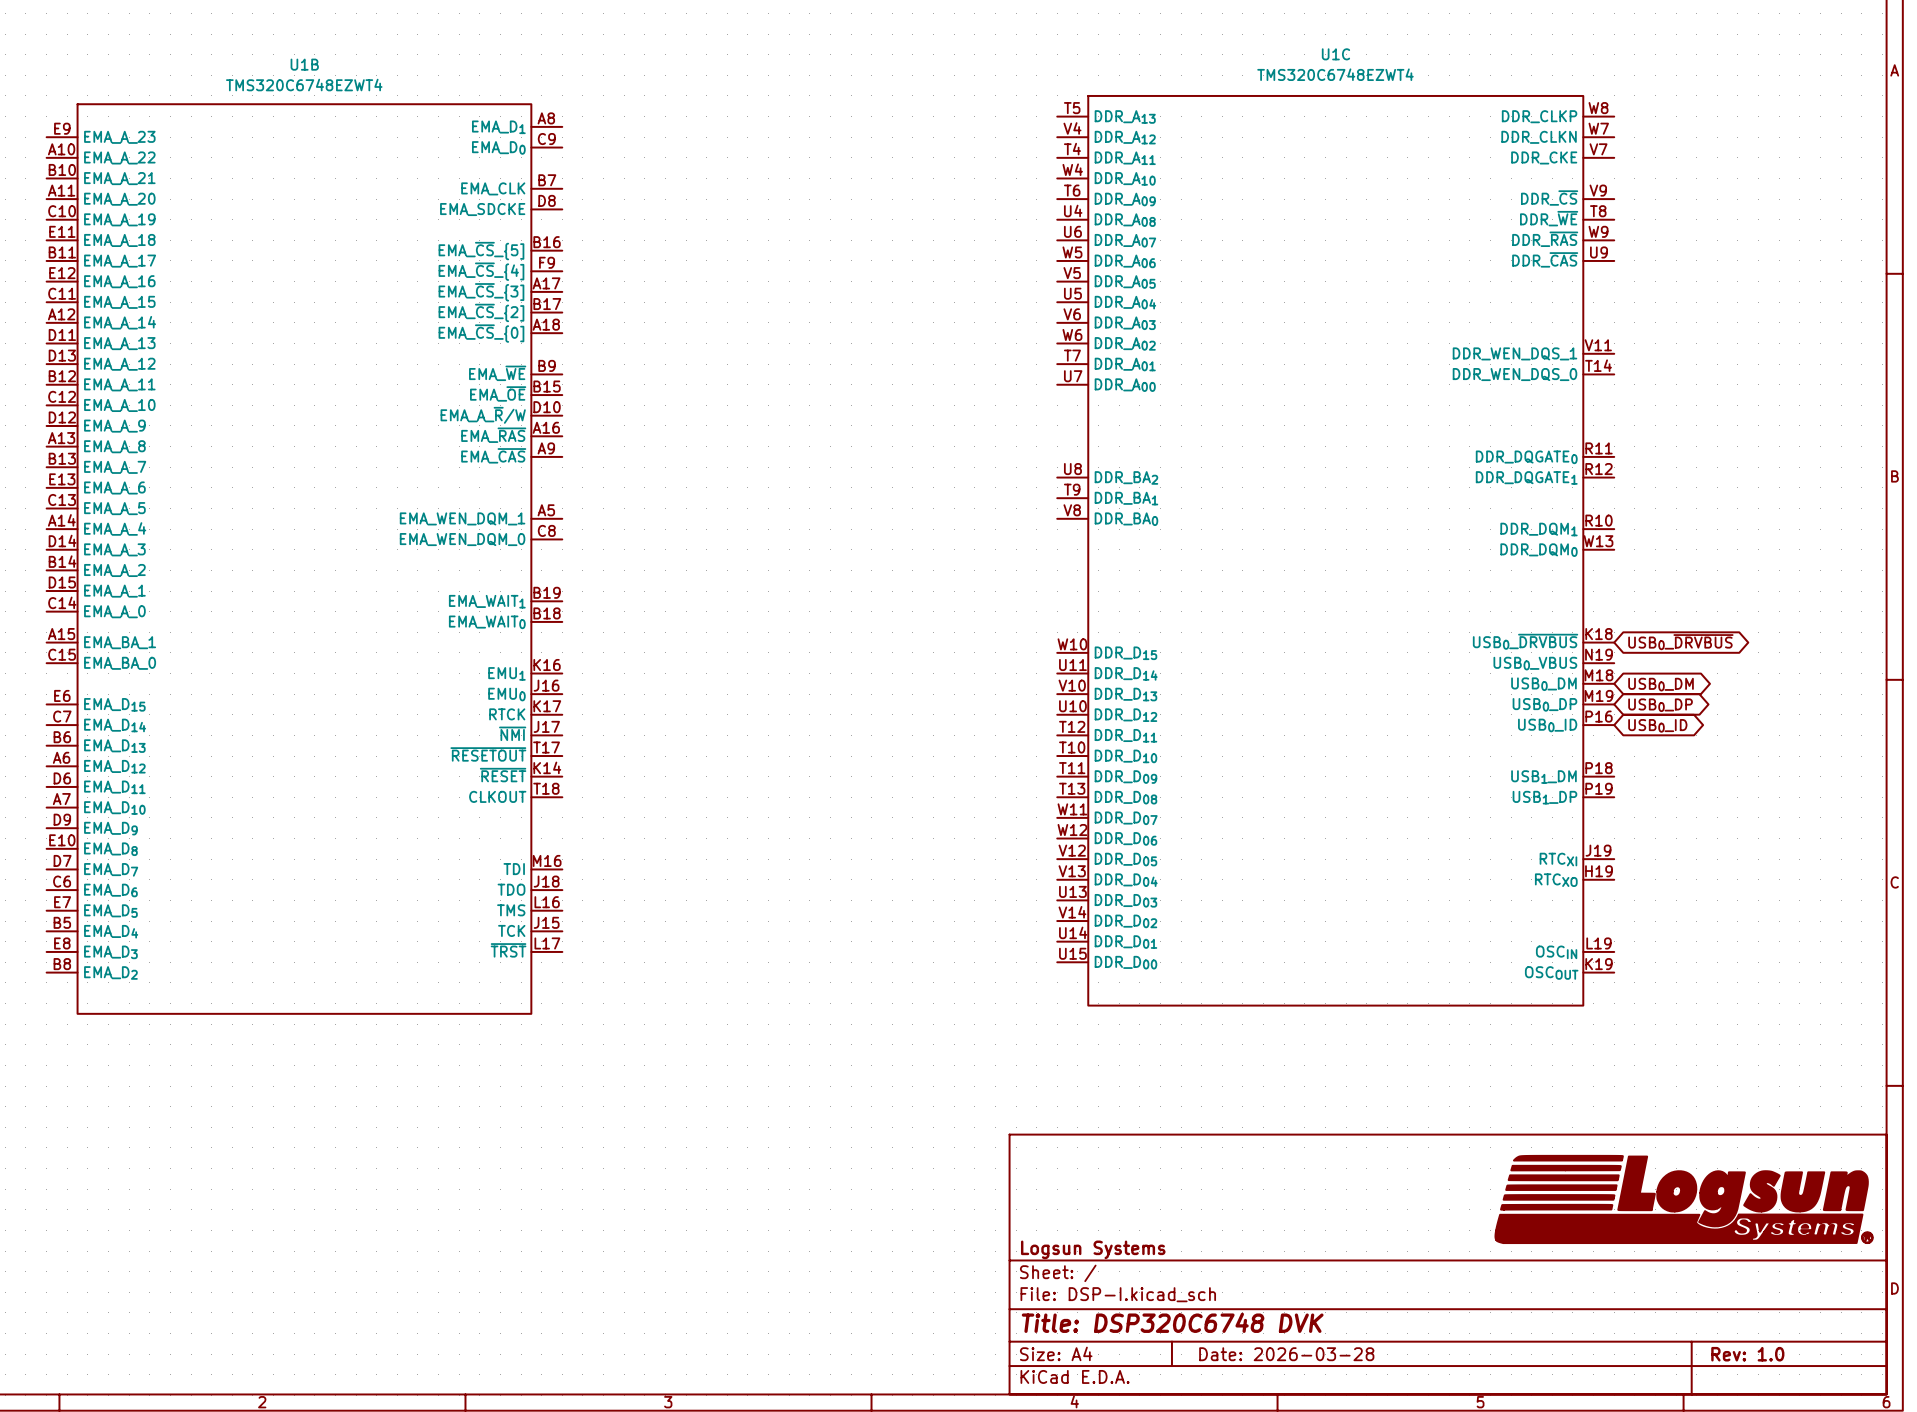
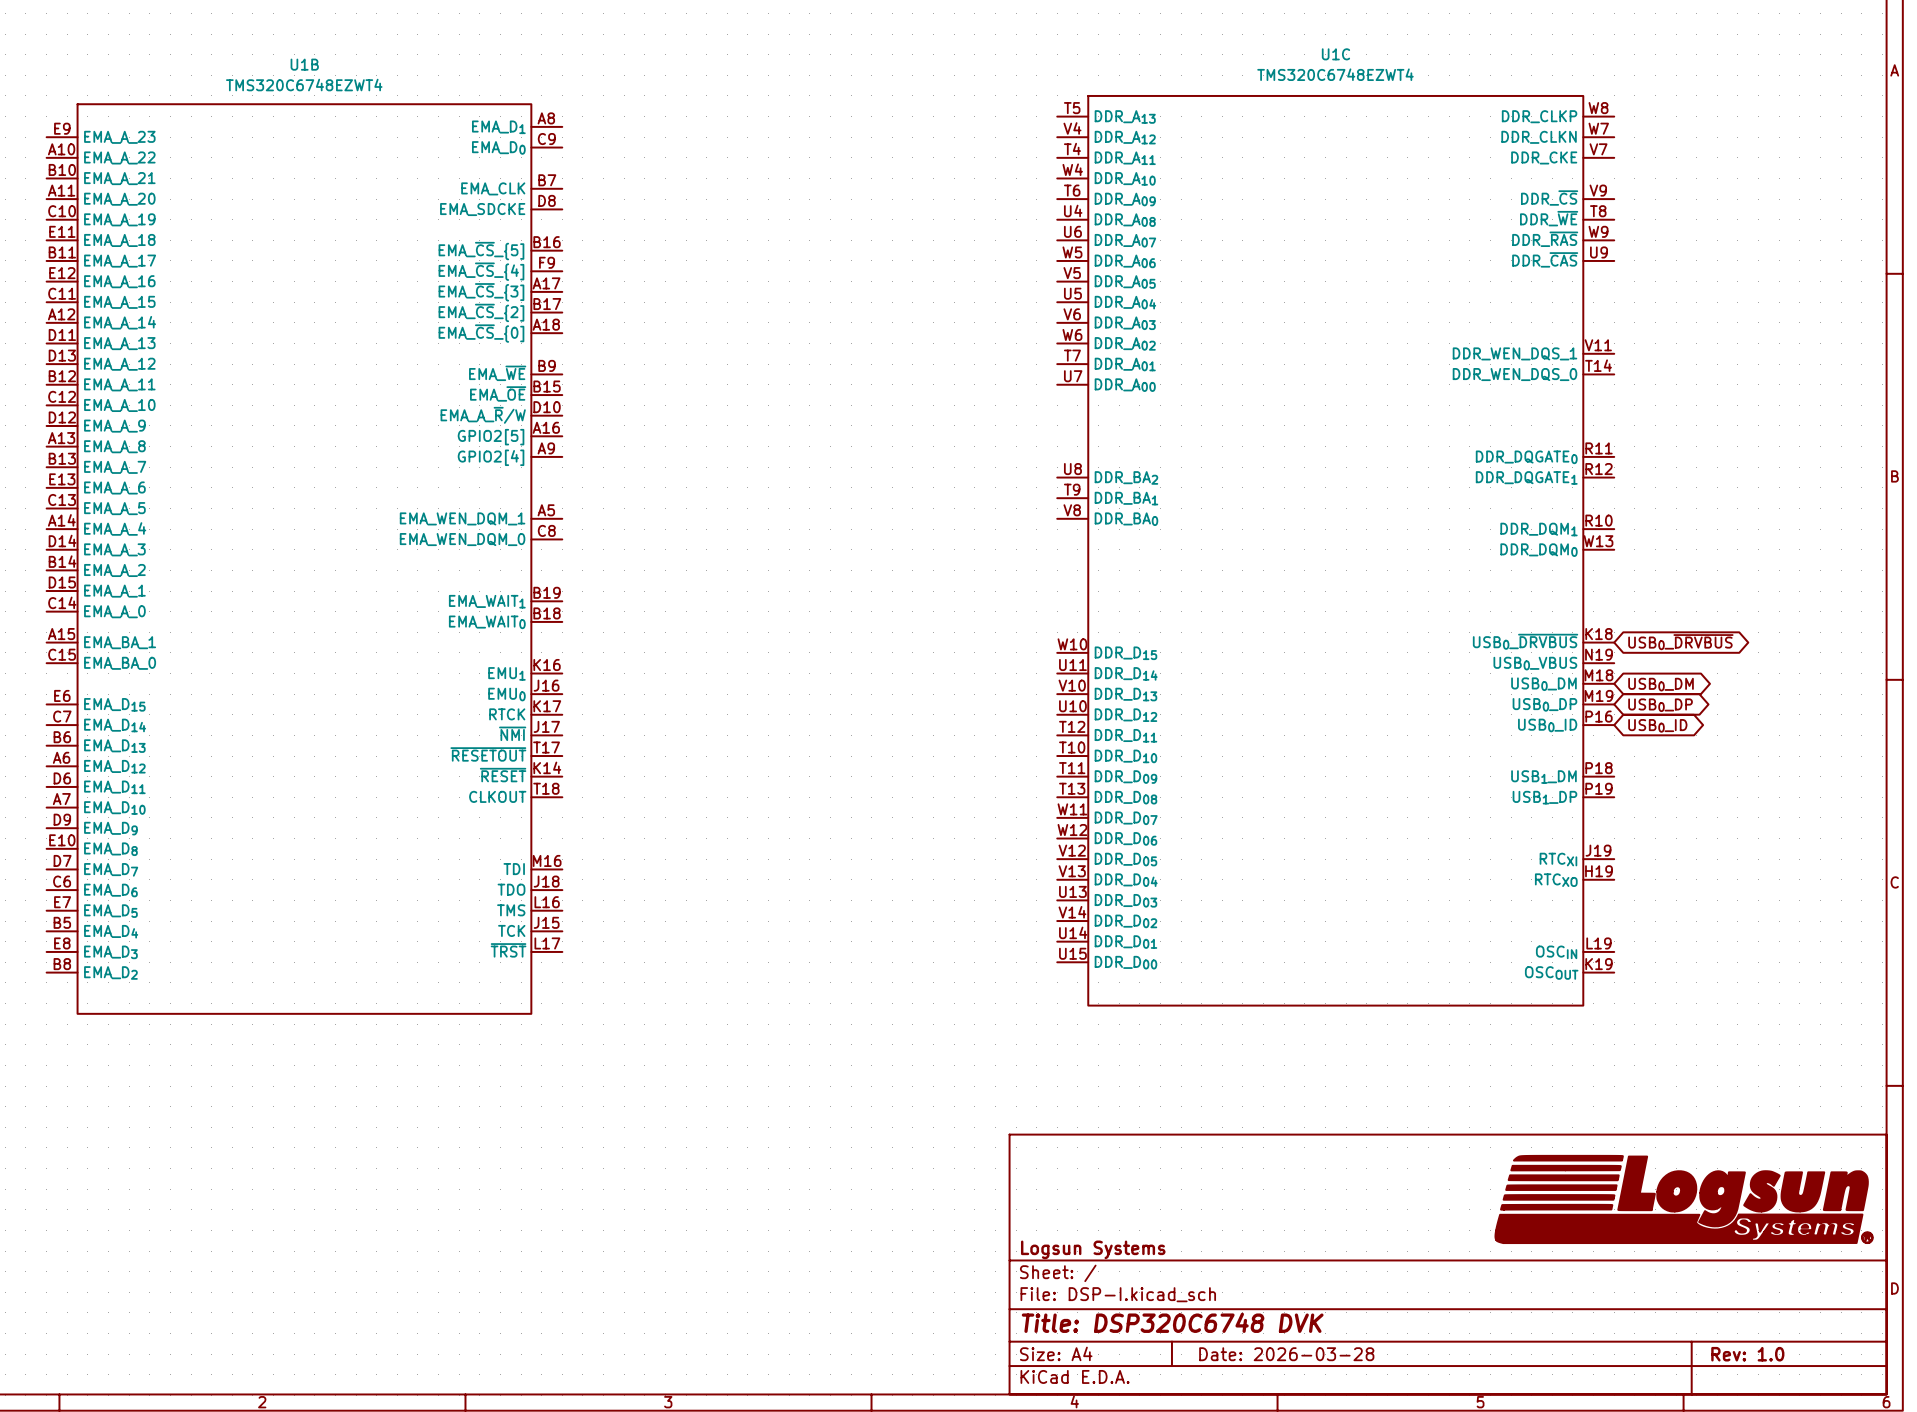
U1B pin name: EMA_~{RAS} (493, 435) -> GPIO2[5] (491, 437)
U1B pin name: EMA_~{CAS} (493, 455) -> GPIO2[4] (491, 457)

